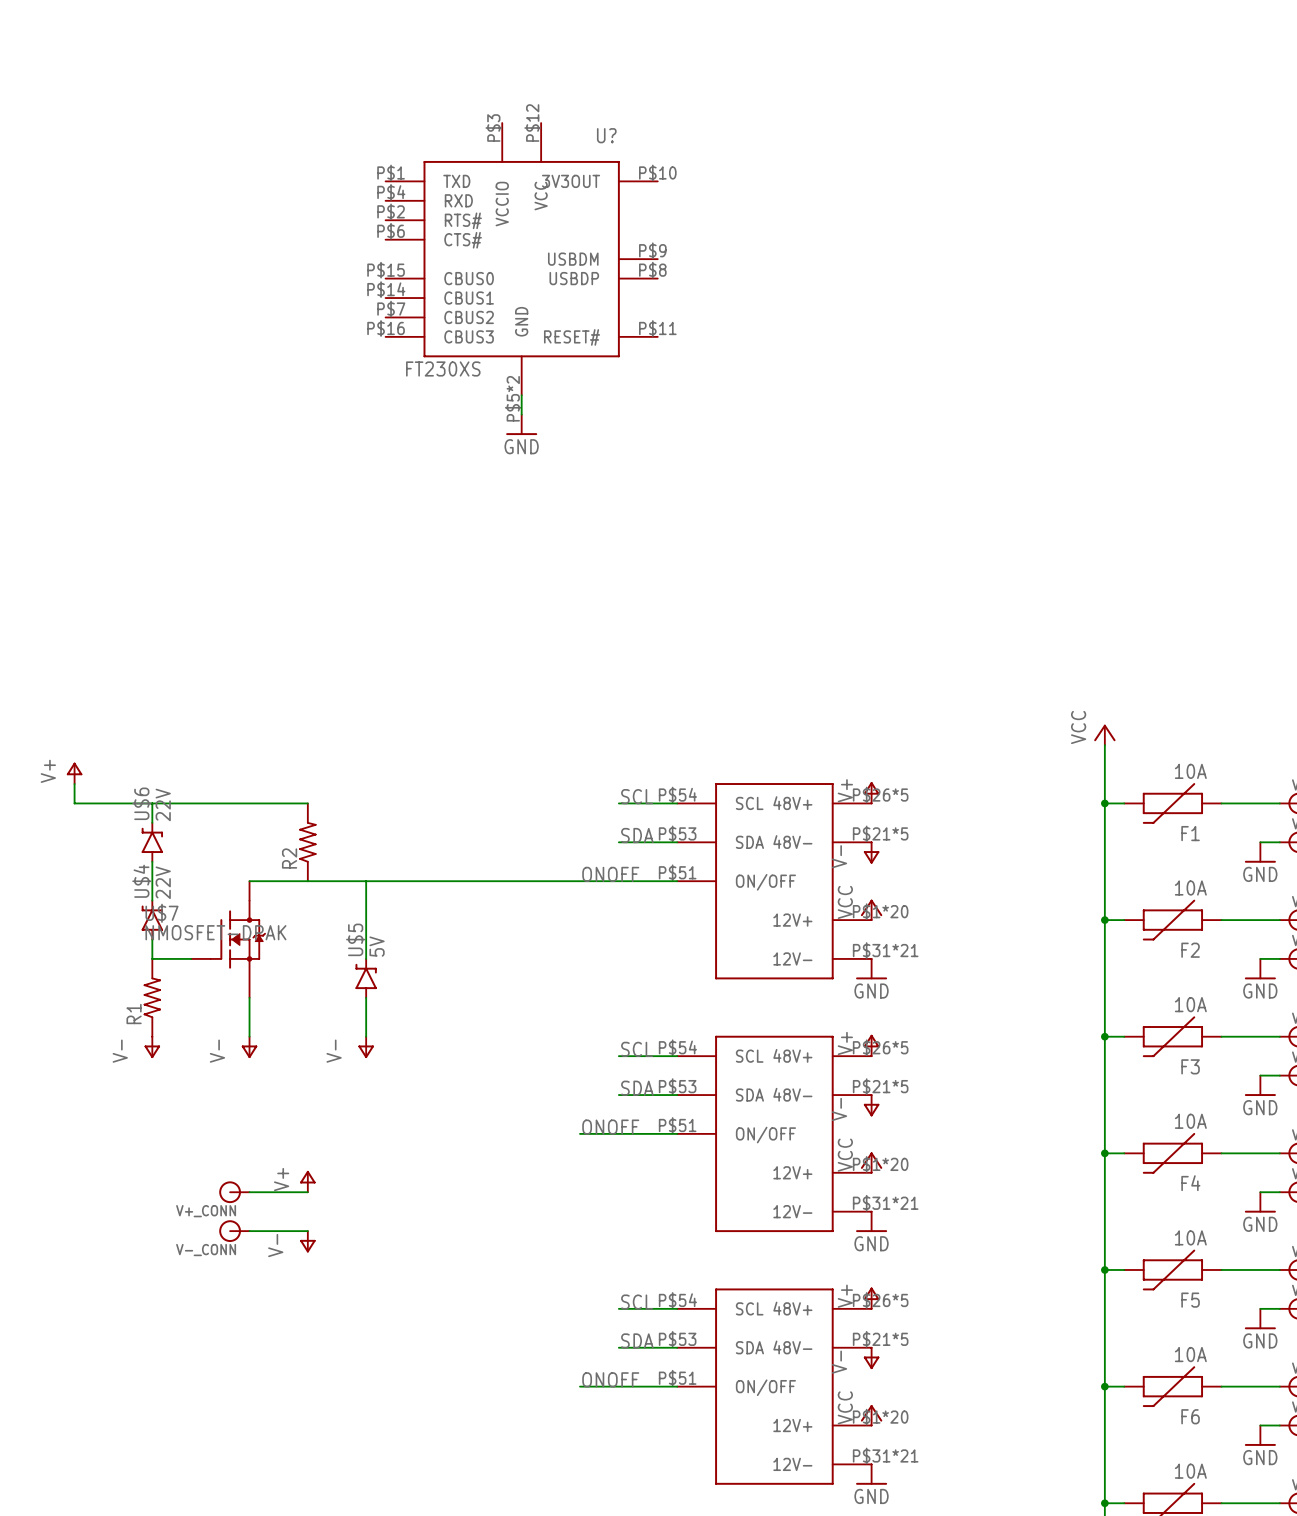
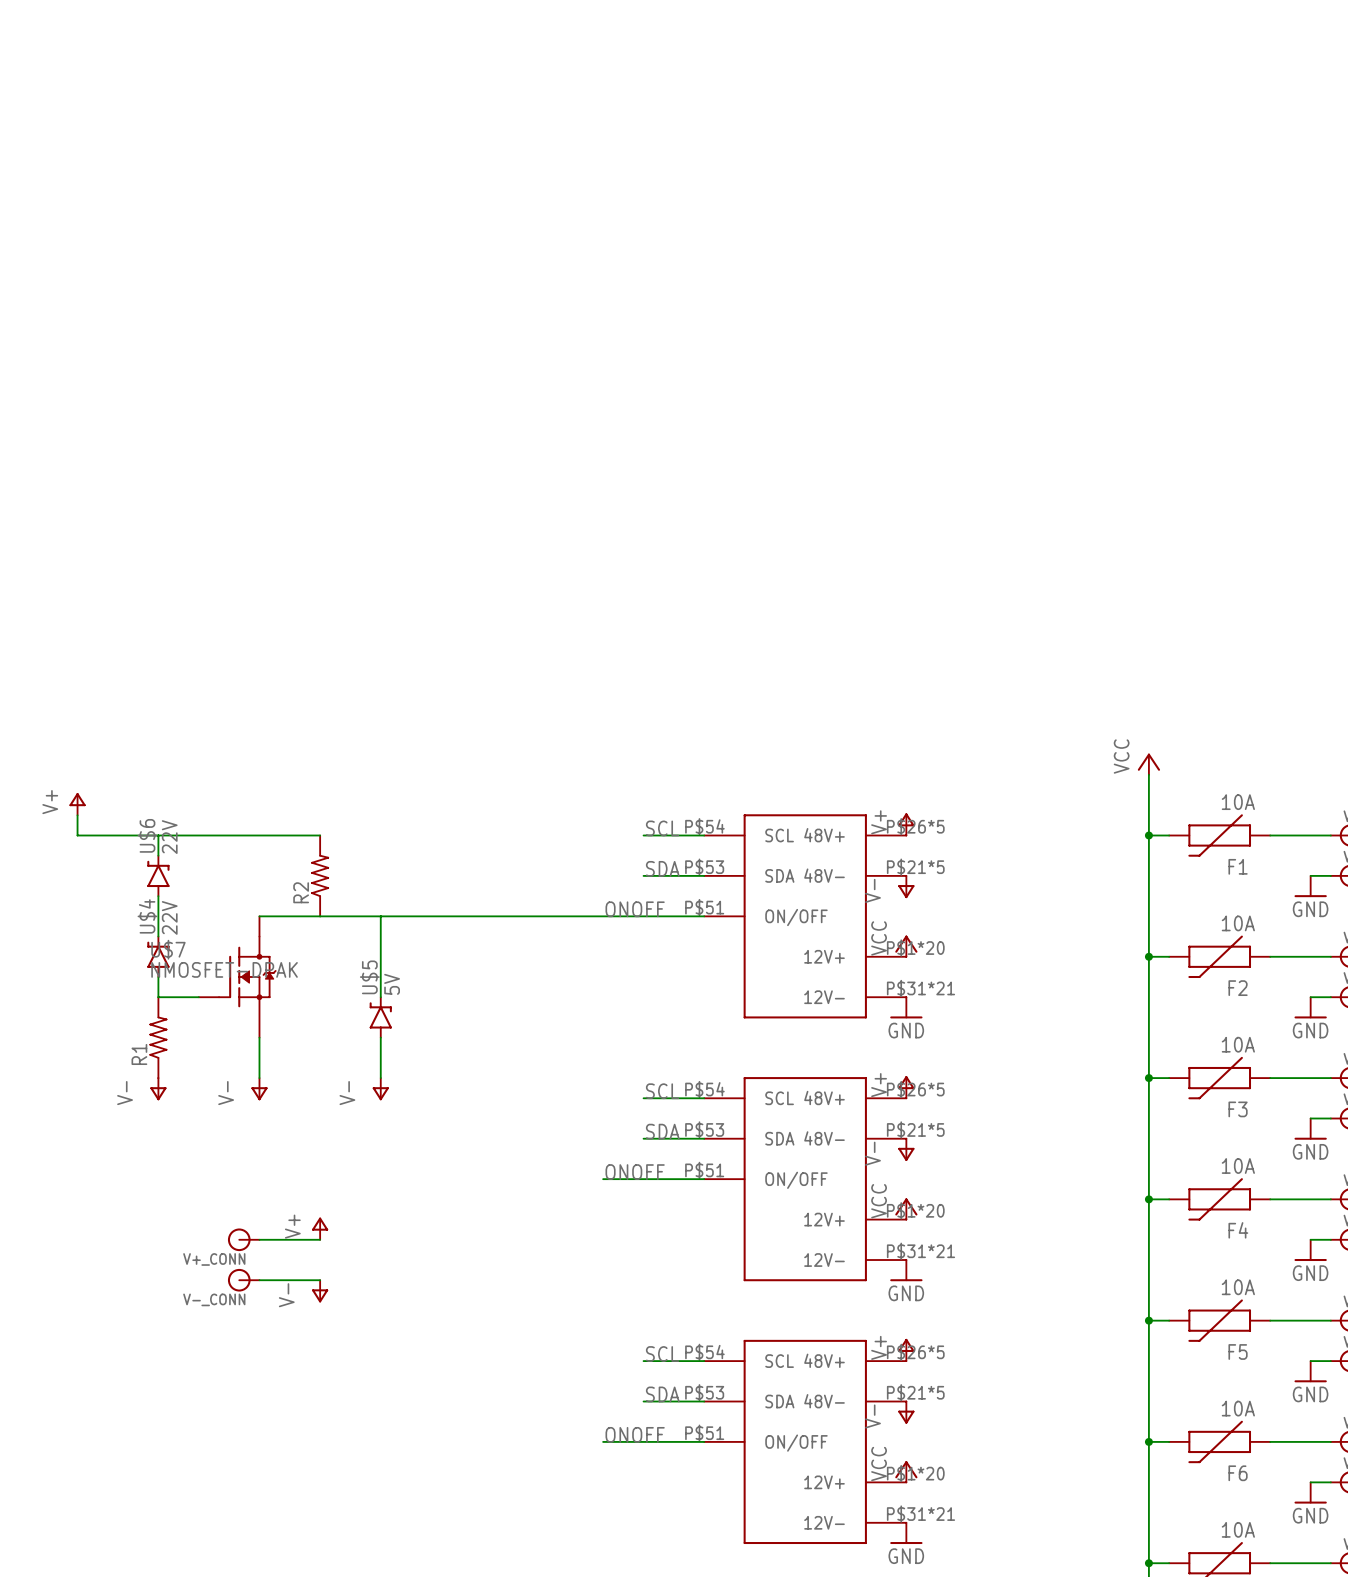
part: (521, 259) -> none
wire: (521, 395) (521, 414) -> none
power symbol: GND (521, 424) -> none

